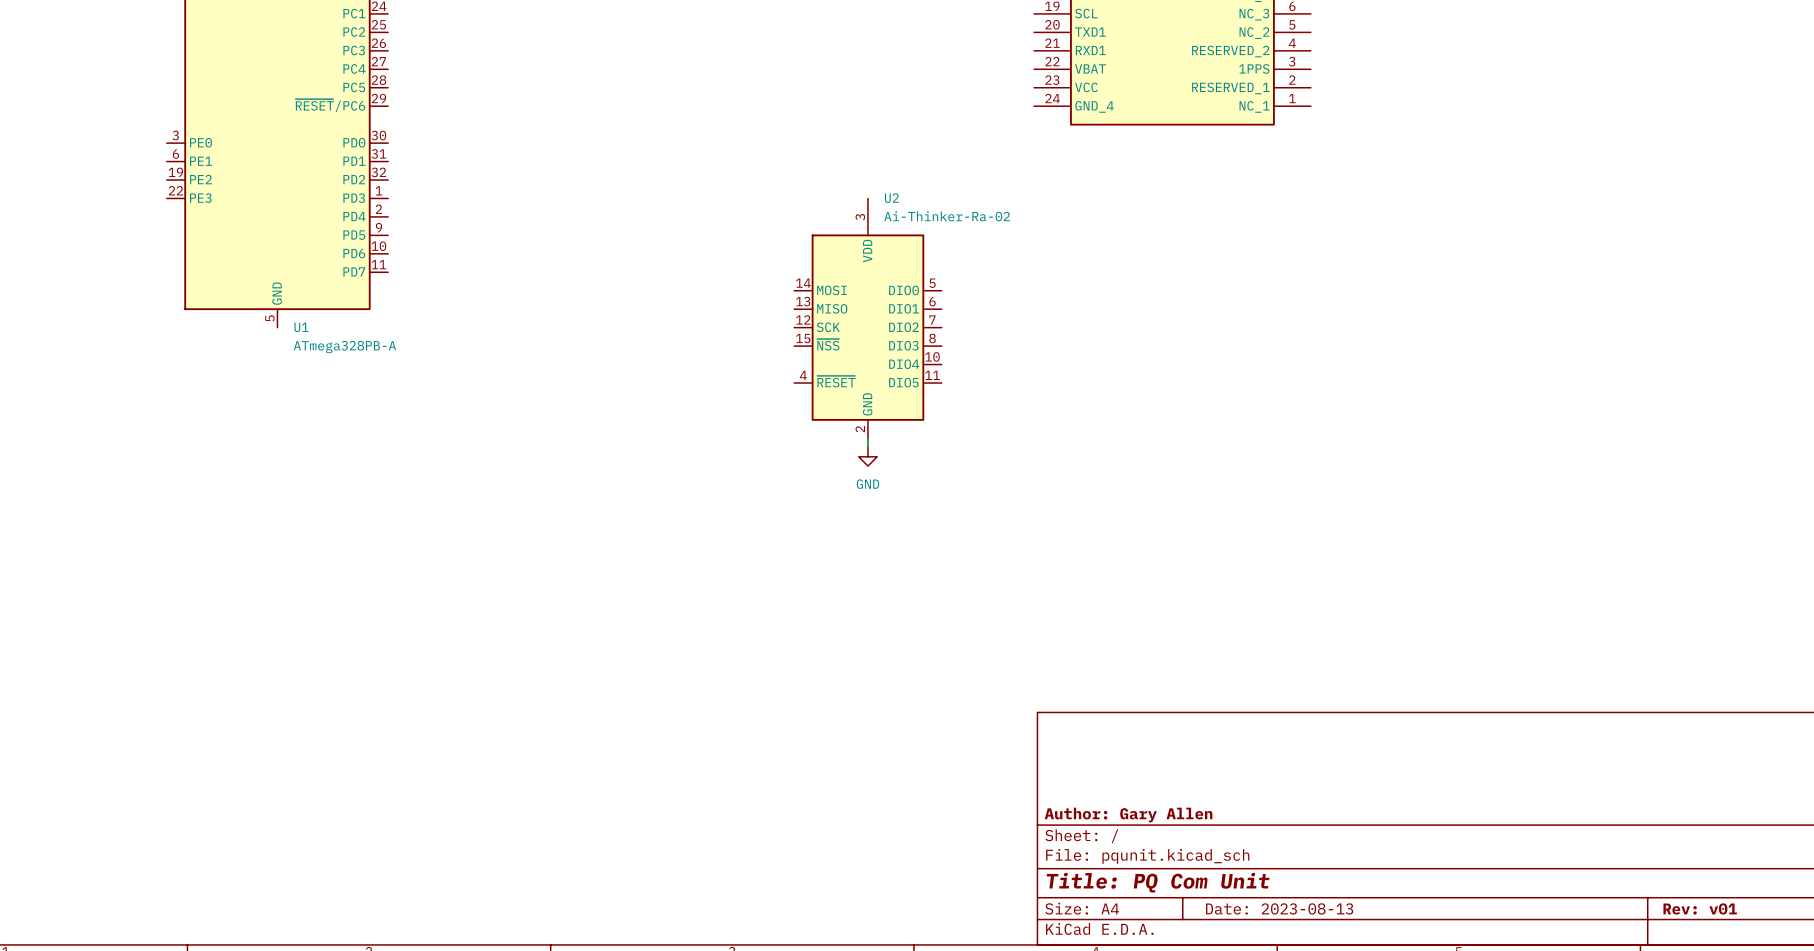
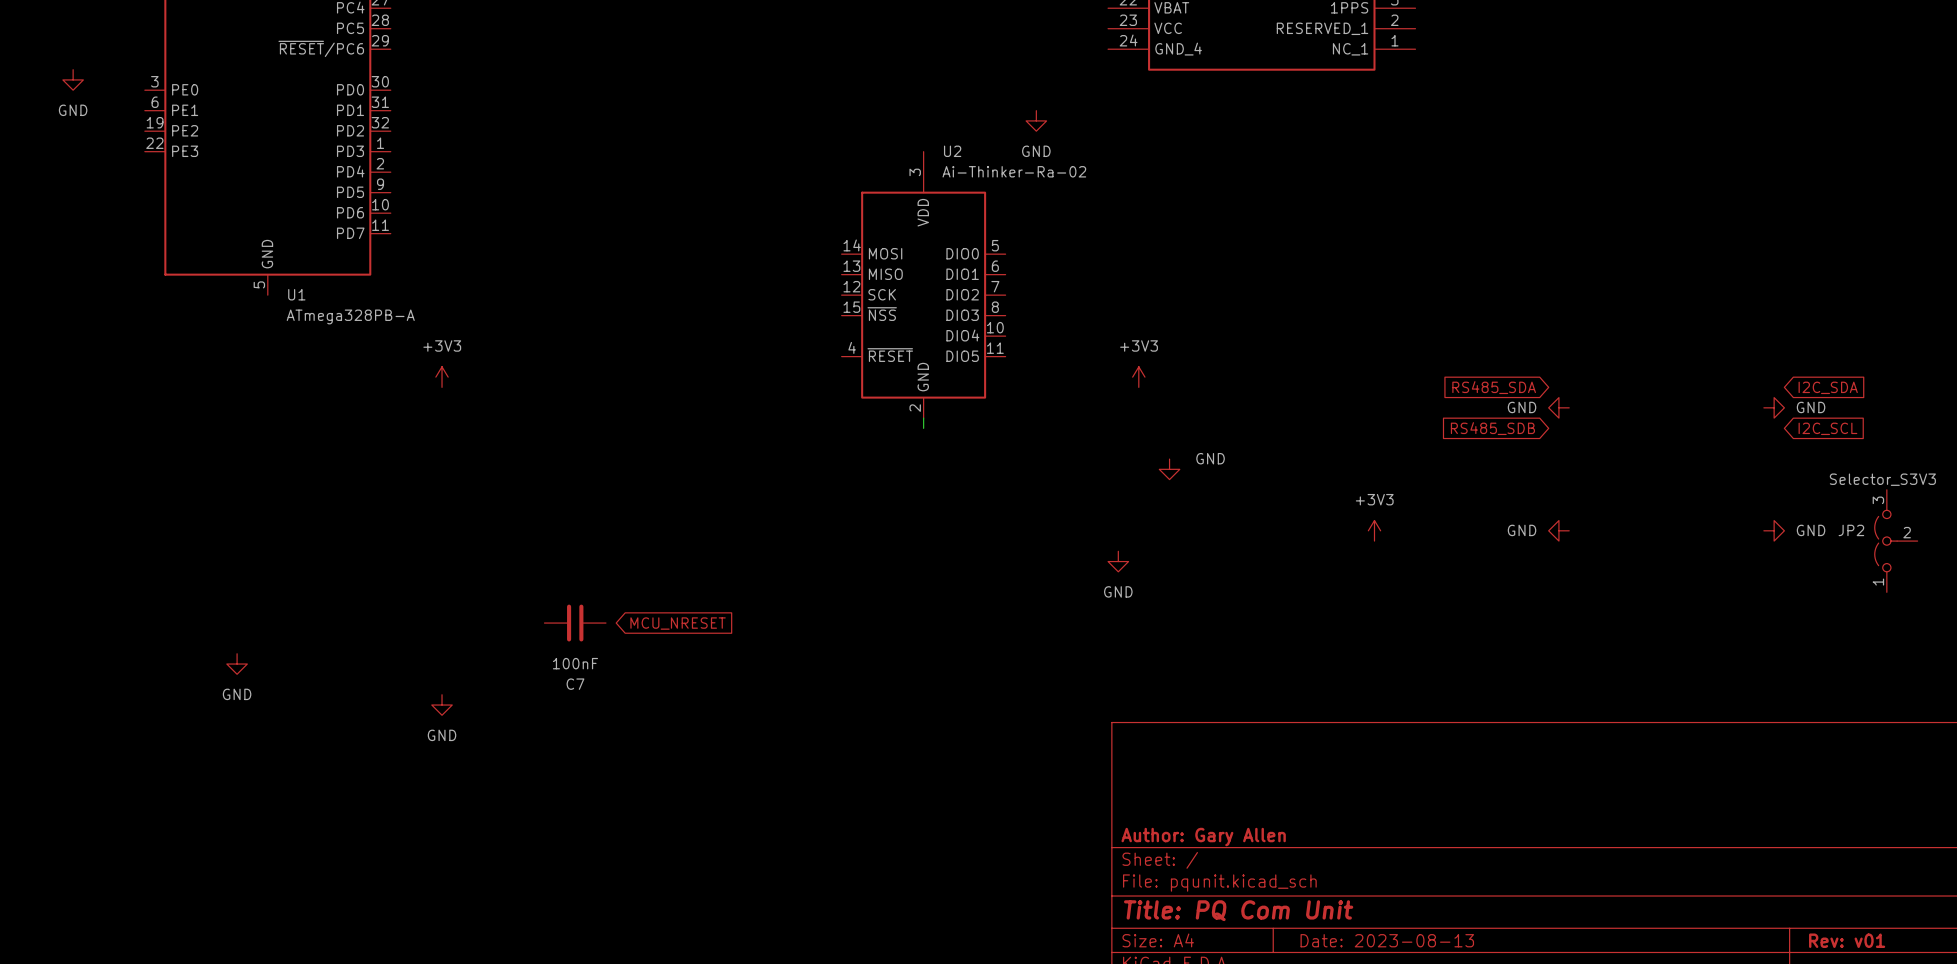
power symbol: none -> GND (73, 79)
power symbol: none -> GND (1036, 120)
power symbol: none -> +3V3 (442, 377)
power symbol: none -> +3V3 (1138, 377)
global label: none -> RS485_SDA (1494, 387)
global label: none -> I2C_SDA (1828, 387)
power symbol: none -> GND (1558, 407)
power symbol: none -> GND (1774, 407)
global label: none -> RS485_SDB (1492, 428)
global label: none -> I2C_SCL (1827, 428)
power symbol: GND (867, 456) -> none
power symbol: none -> GND (1169, 469)
power symbol: none -> +3V3 (1374, 530)
power symbol: none -> GND (1558, 530)
power symbol: none -> GND (1774, 530)
JP2: none -> Selector_S3V3 (1896, 541)
power symbol: none -> GND (1118, 561)
C7: none -> 100nF (575, 623)
global label: none -> MCU_NRESET (678, 623)
power symbol: none -> GND (237, 664)
power symbol: none -> GND (442, 705)

